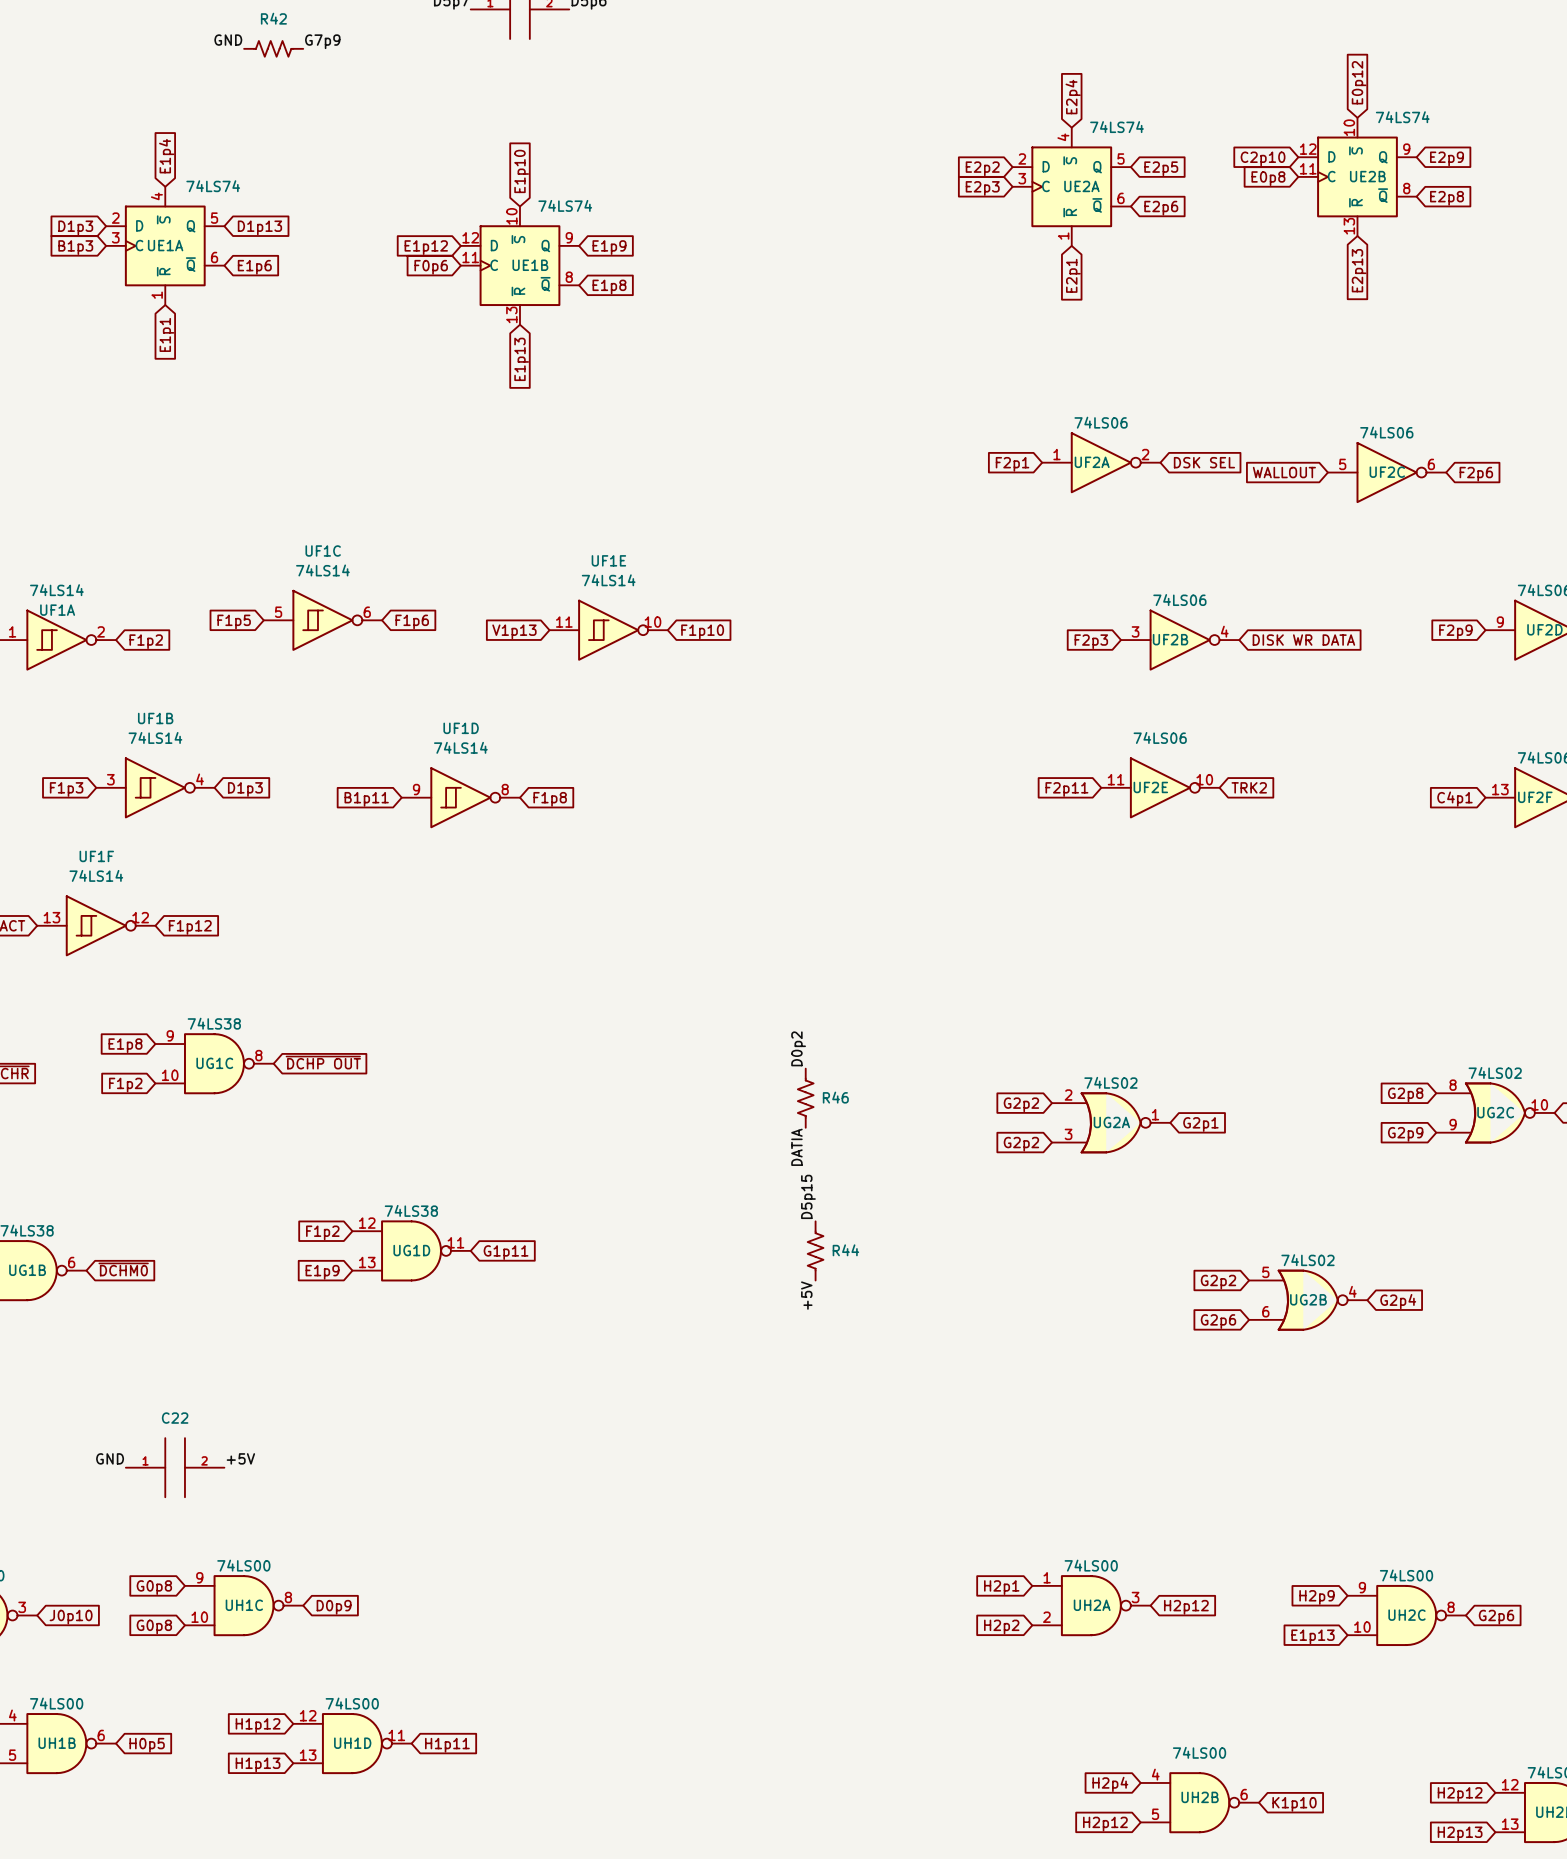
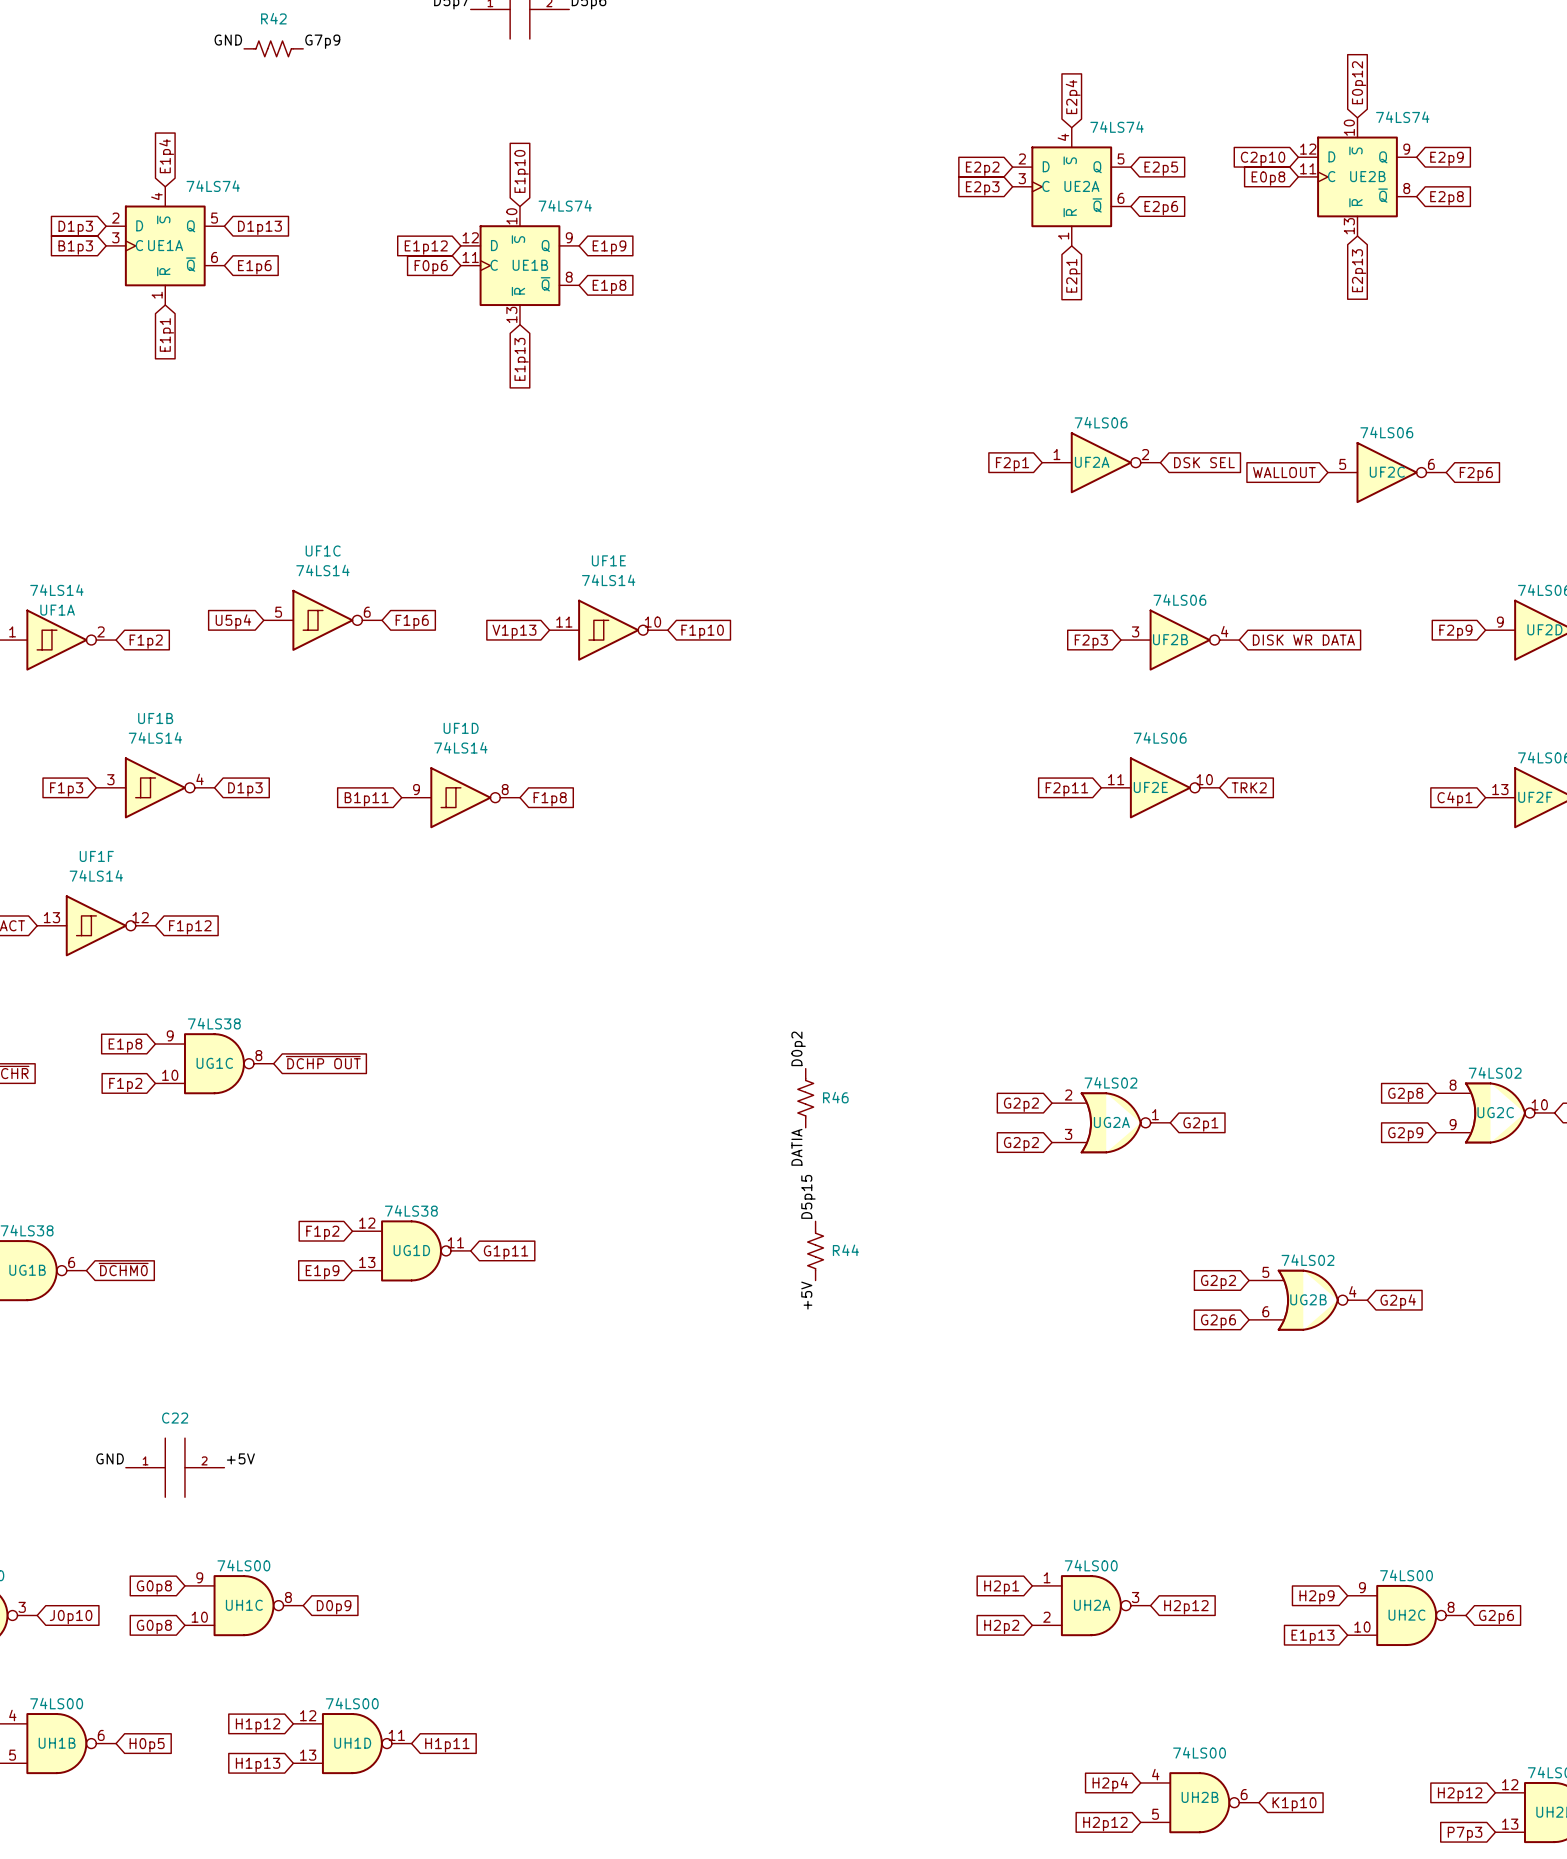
global label: F1p5 (234, 621) -> U5p4 (233, 621)
global label: H2p13 (1460, 1833) -> P7p3 (1465, 1833)

